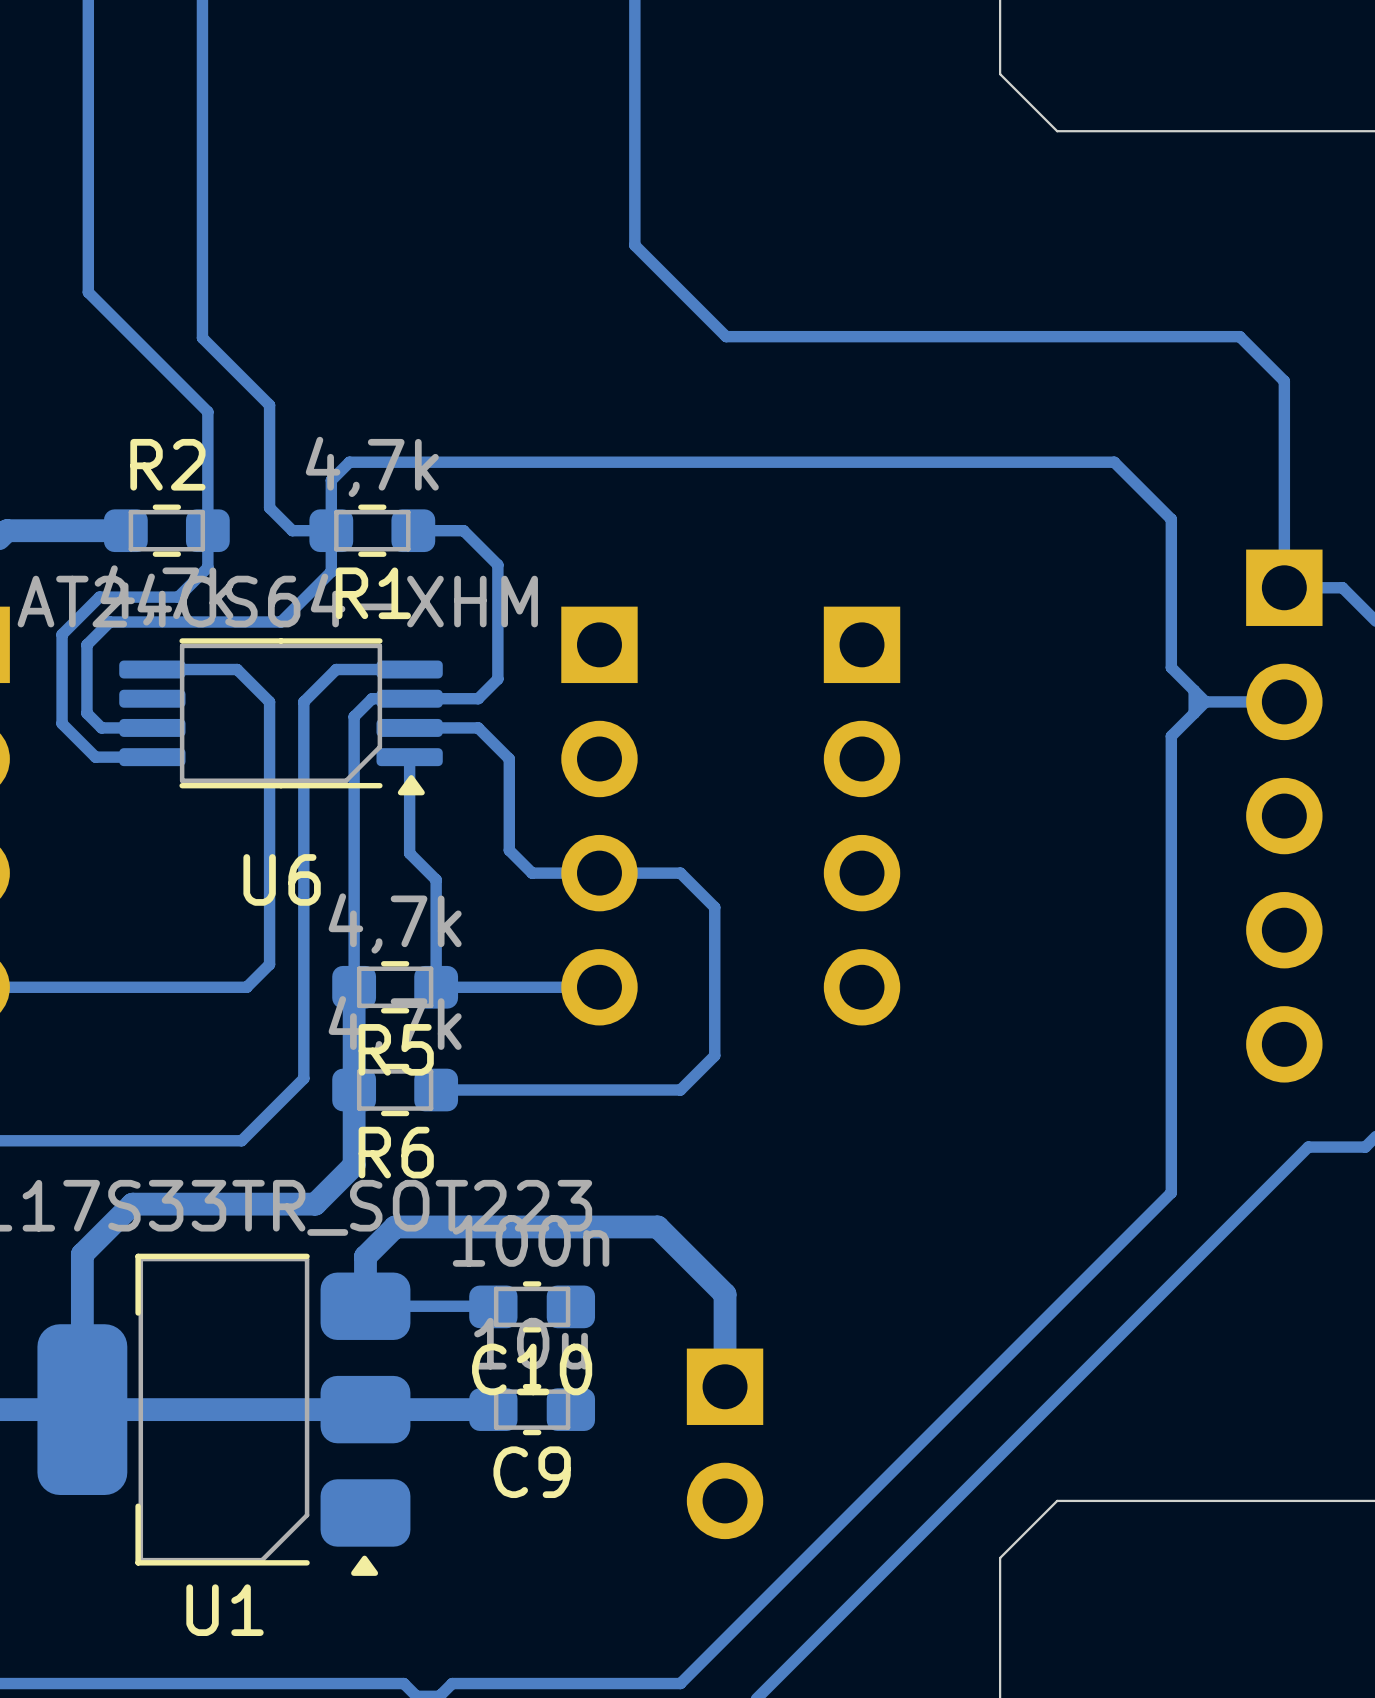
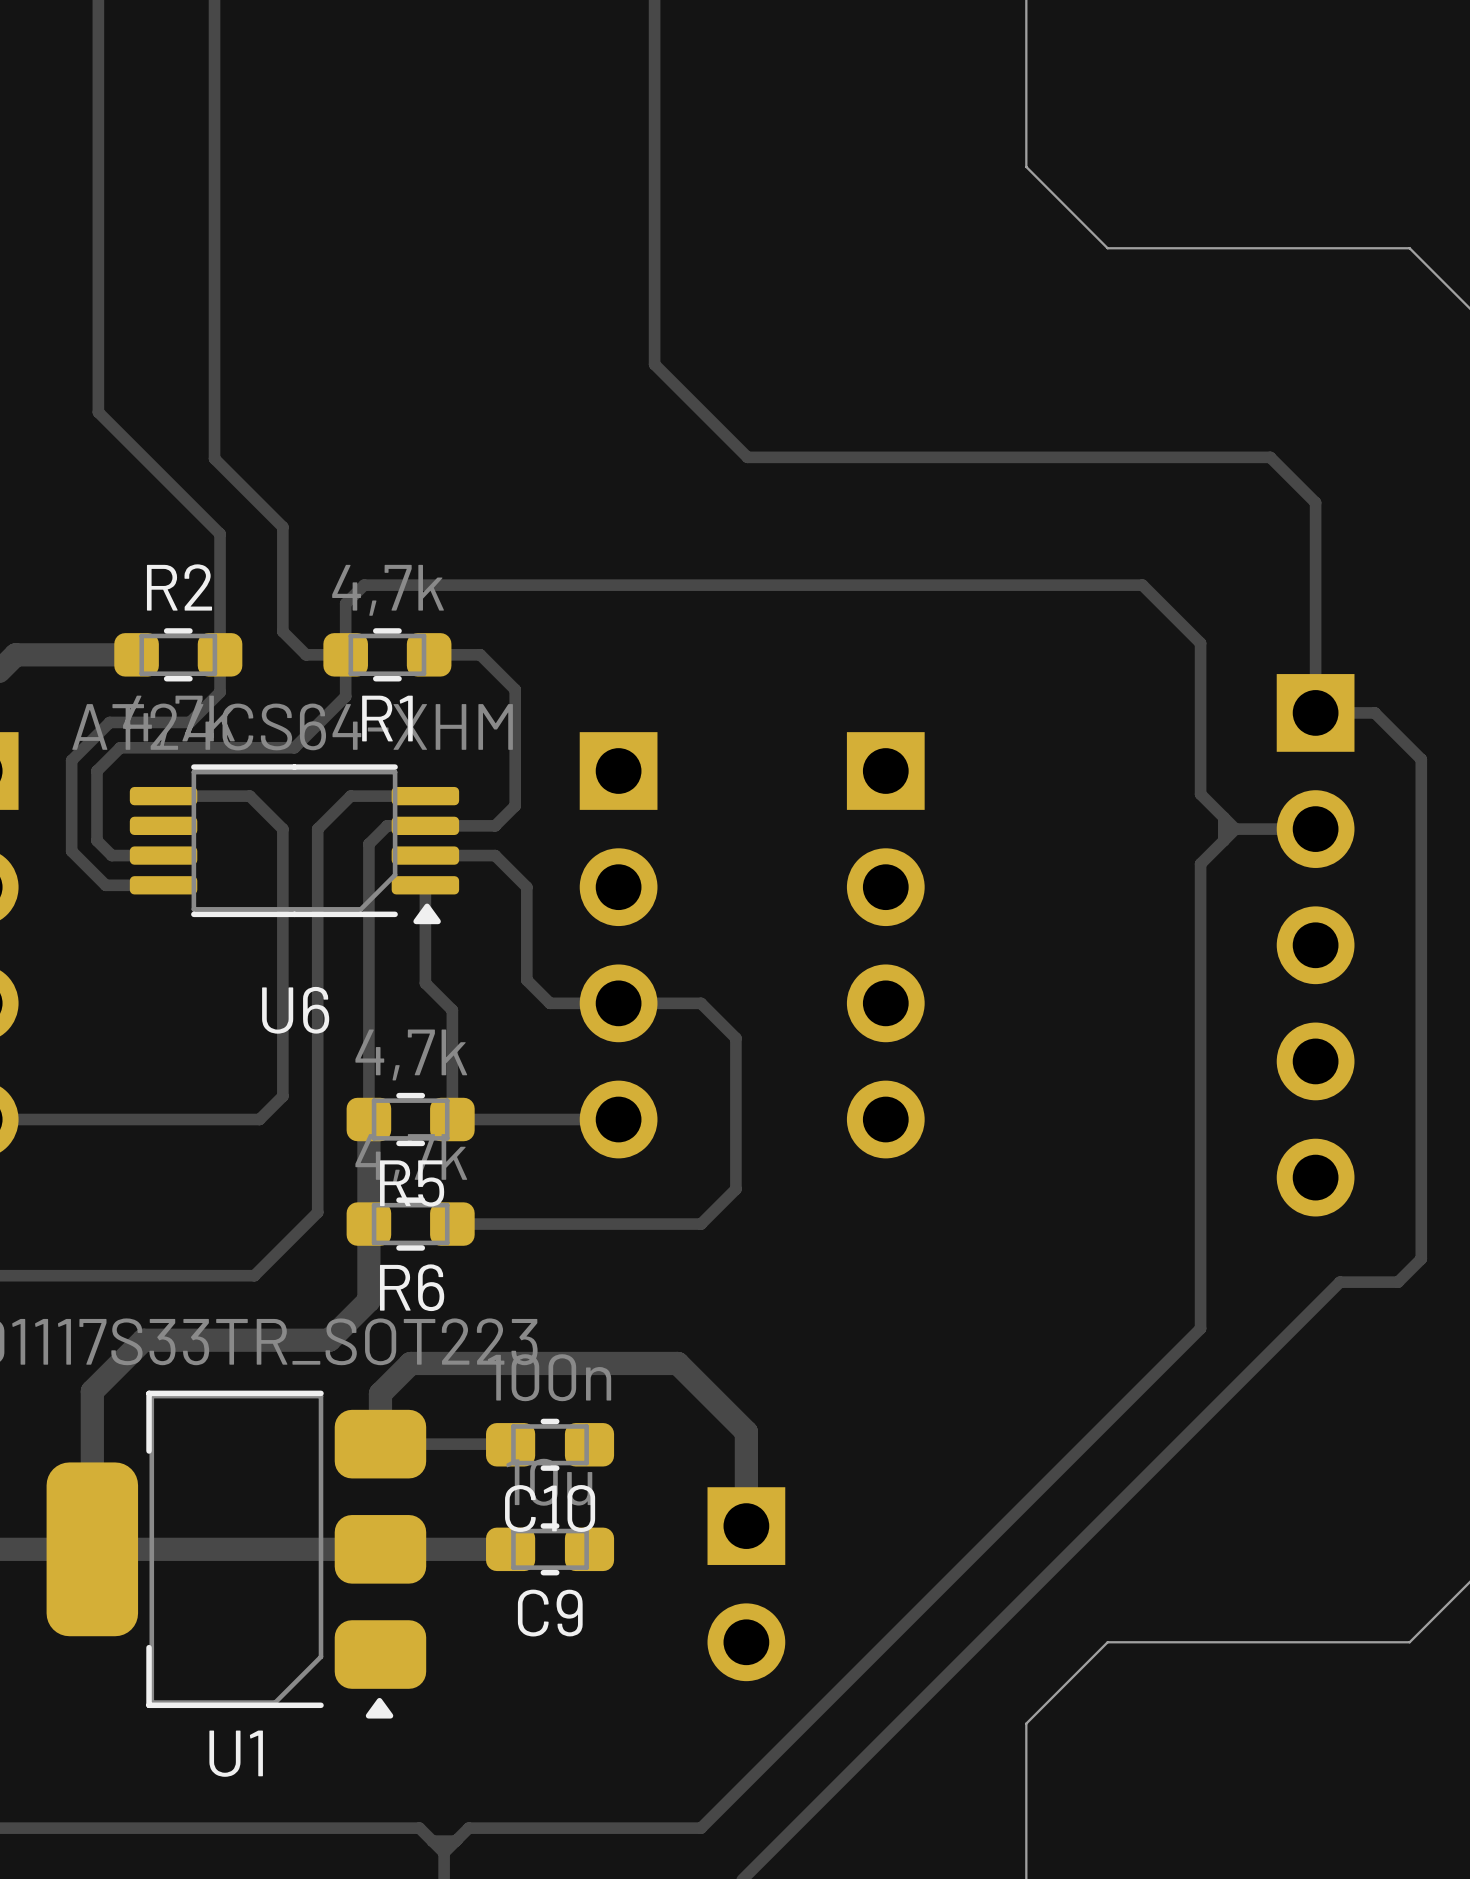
board edge: (1000, 51) (1000, 74) (1057, 131) (1080, 131) -> (1026, 166) (1107, 248)
board edge: (1080, 1500) (1057, 1500) (1000, 1558) (1000, 1580) -> (1107, 1642) (1026, 1723)

